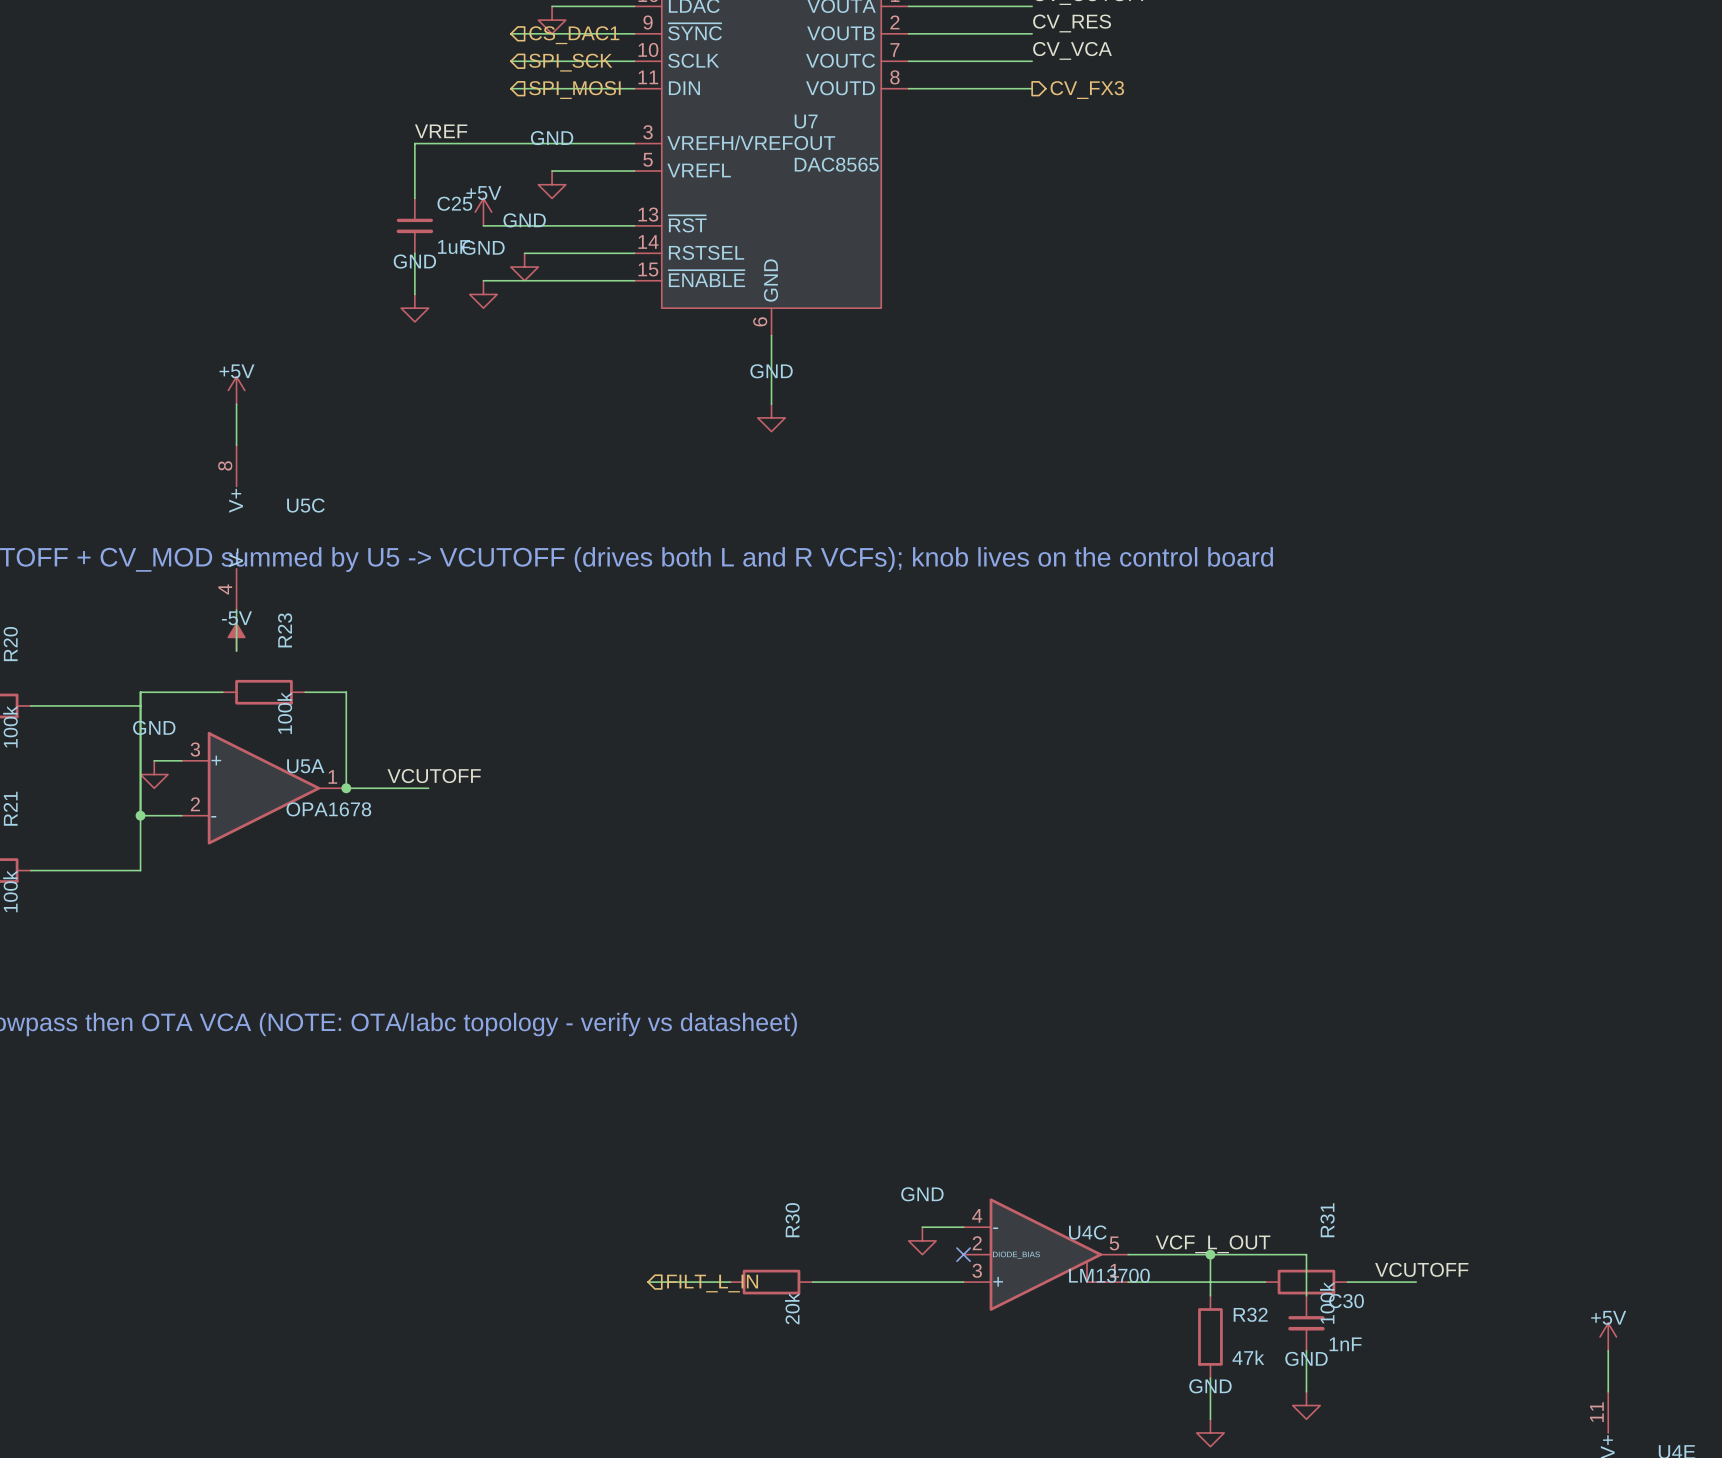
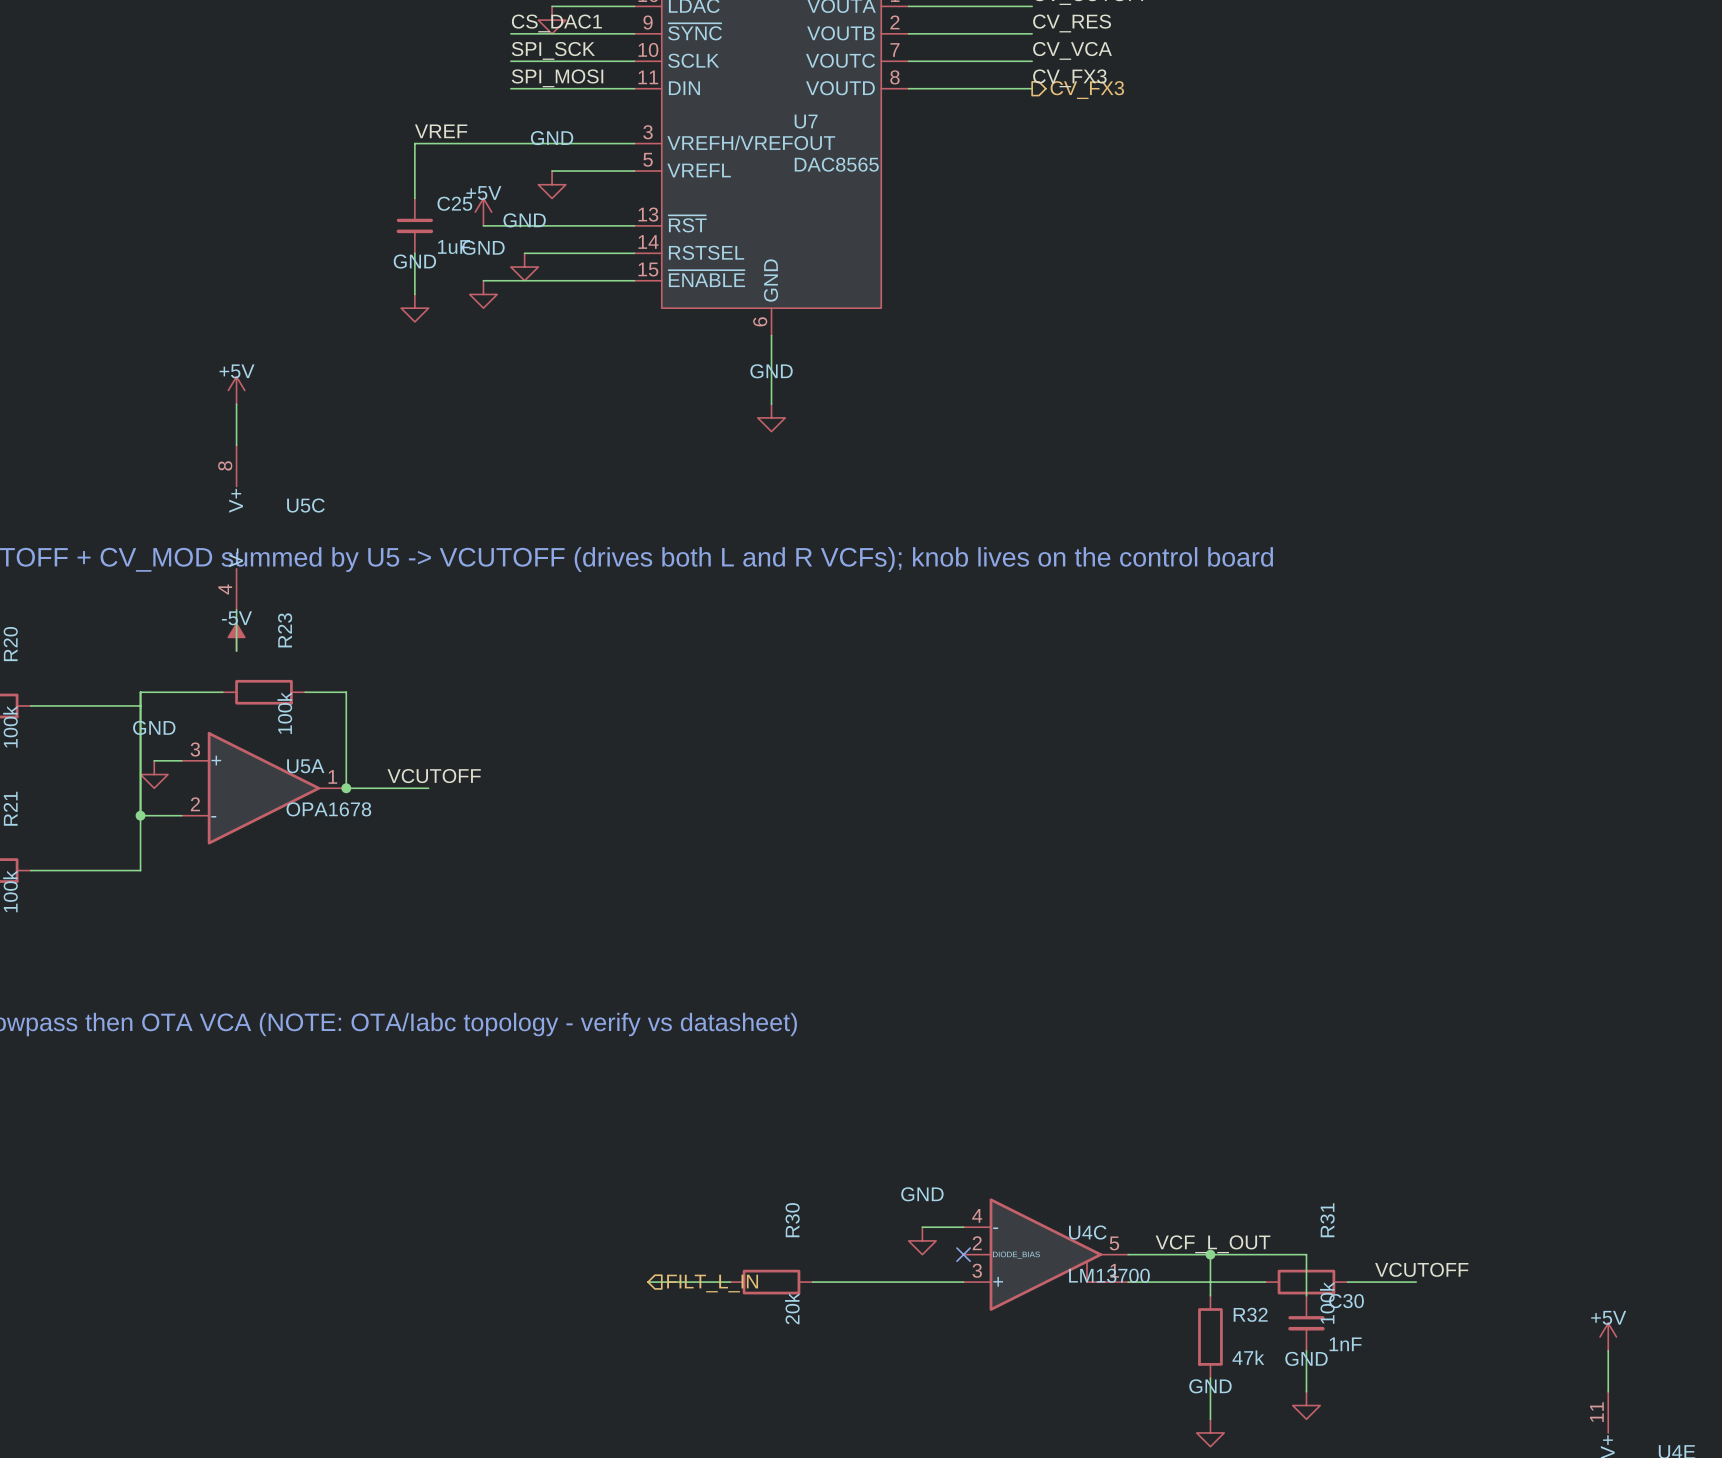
label: none -> CS_DAC1 (556, 23)
hierarchical label: CS_DAC1 (574, 35) -> none
label: none -> SPI_SCK (553, 50)
hierarchical label: SPI_SCK (570, 62) -> none
label: none -> SPI_MOSI (557, 78)
label: none -> CV_FX3 (1069, 78)
hierarchical label: SPI_MOSI (574, 90) -> none

